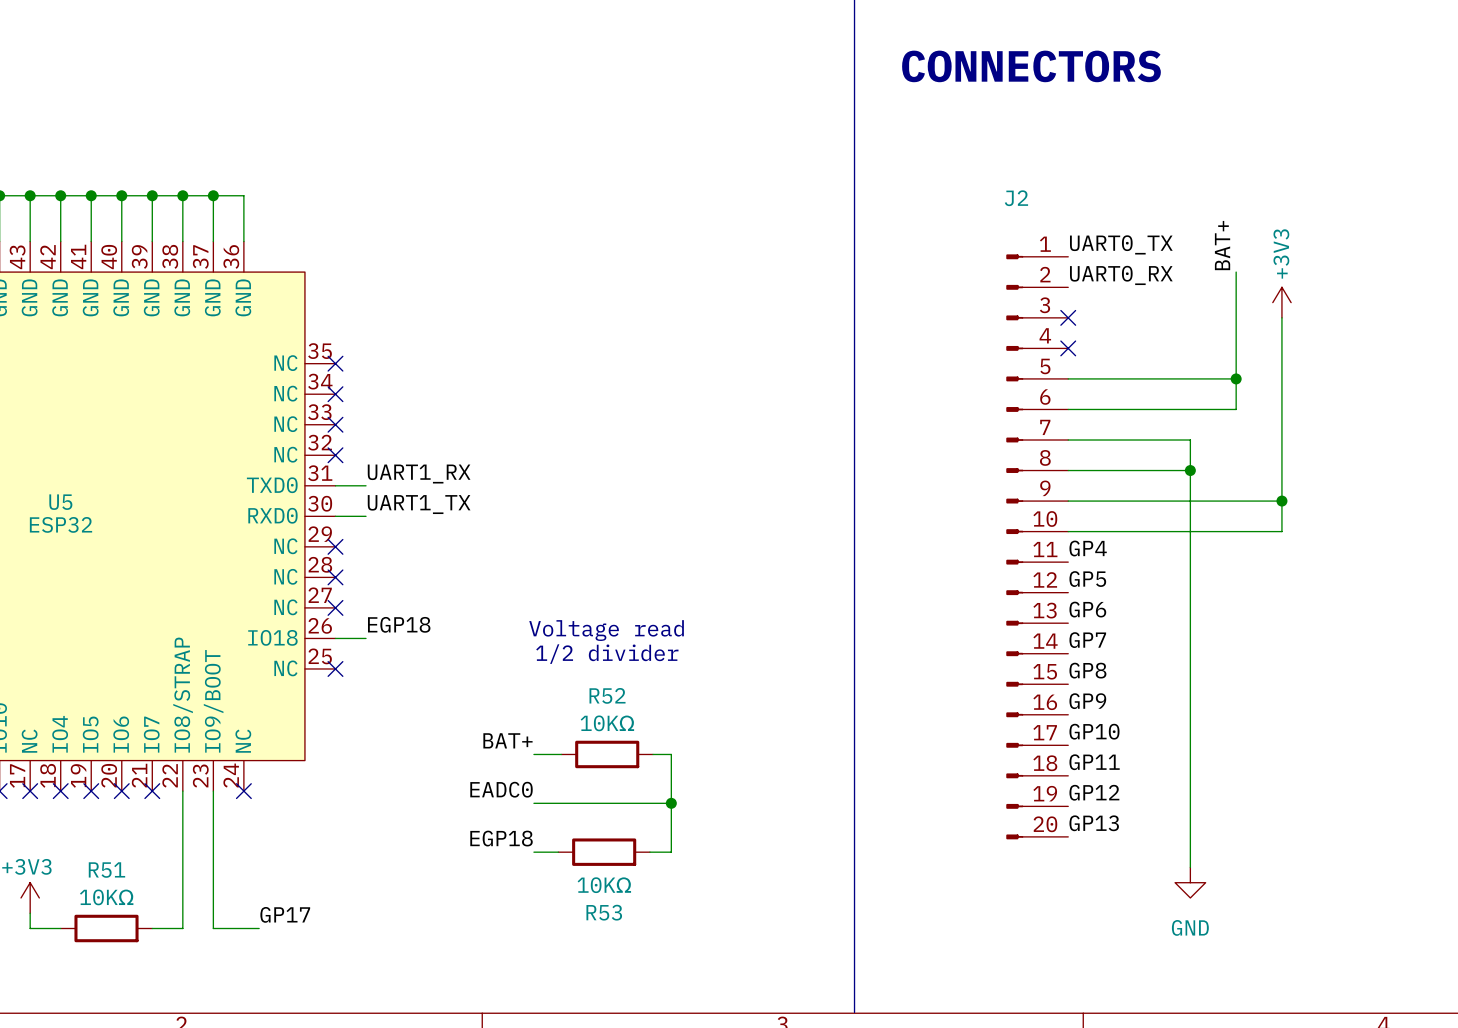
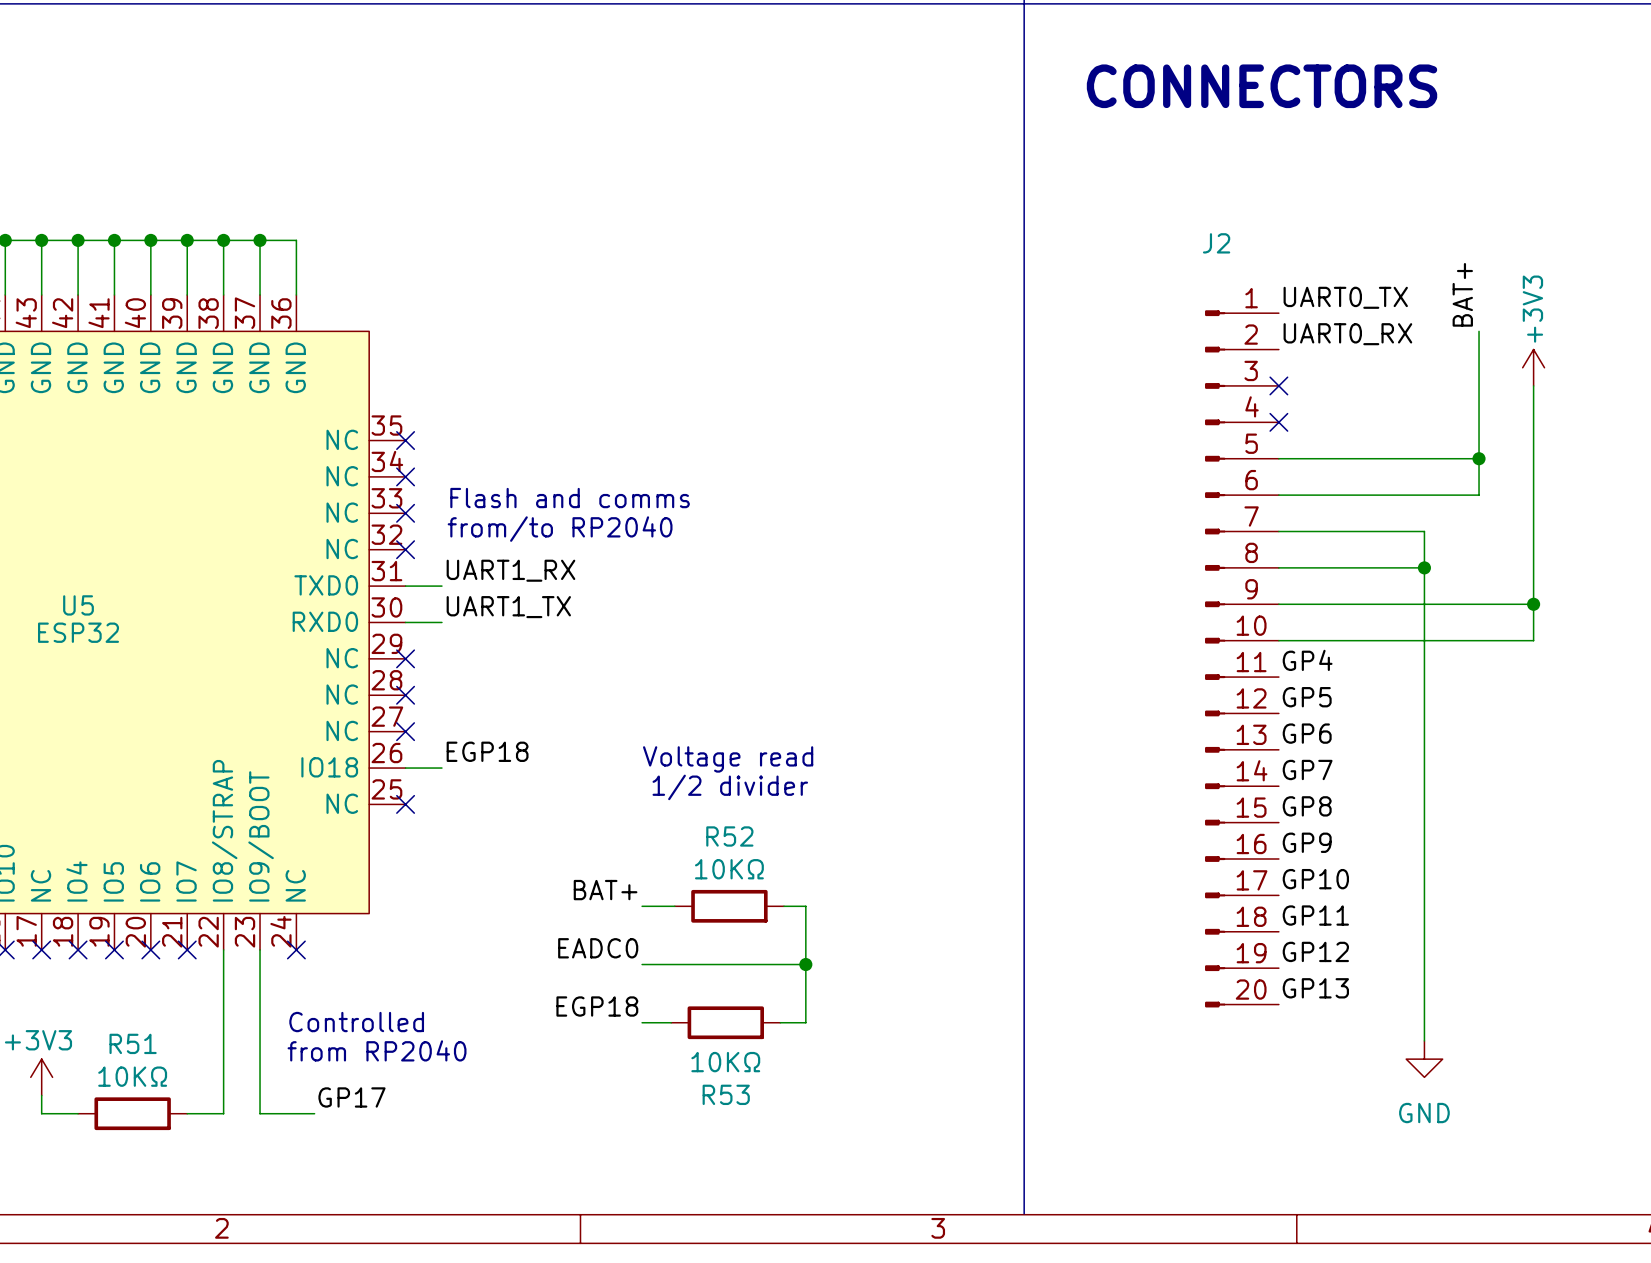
text: none -> Flash and comms (570, 498)
text: none -> from/to RP2040 (560, 529)
text: none -> Controlled (356, 1022)
text: none -> from RP2040 (377, 1050)

